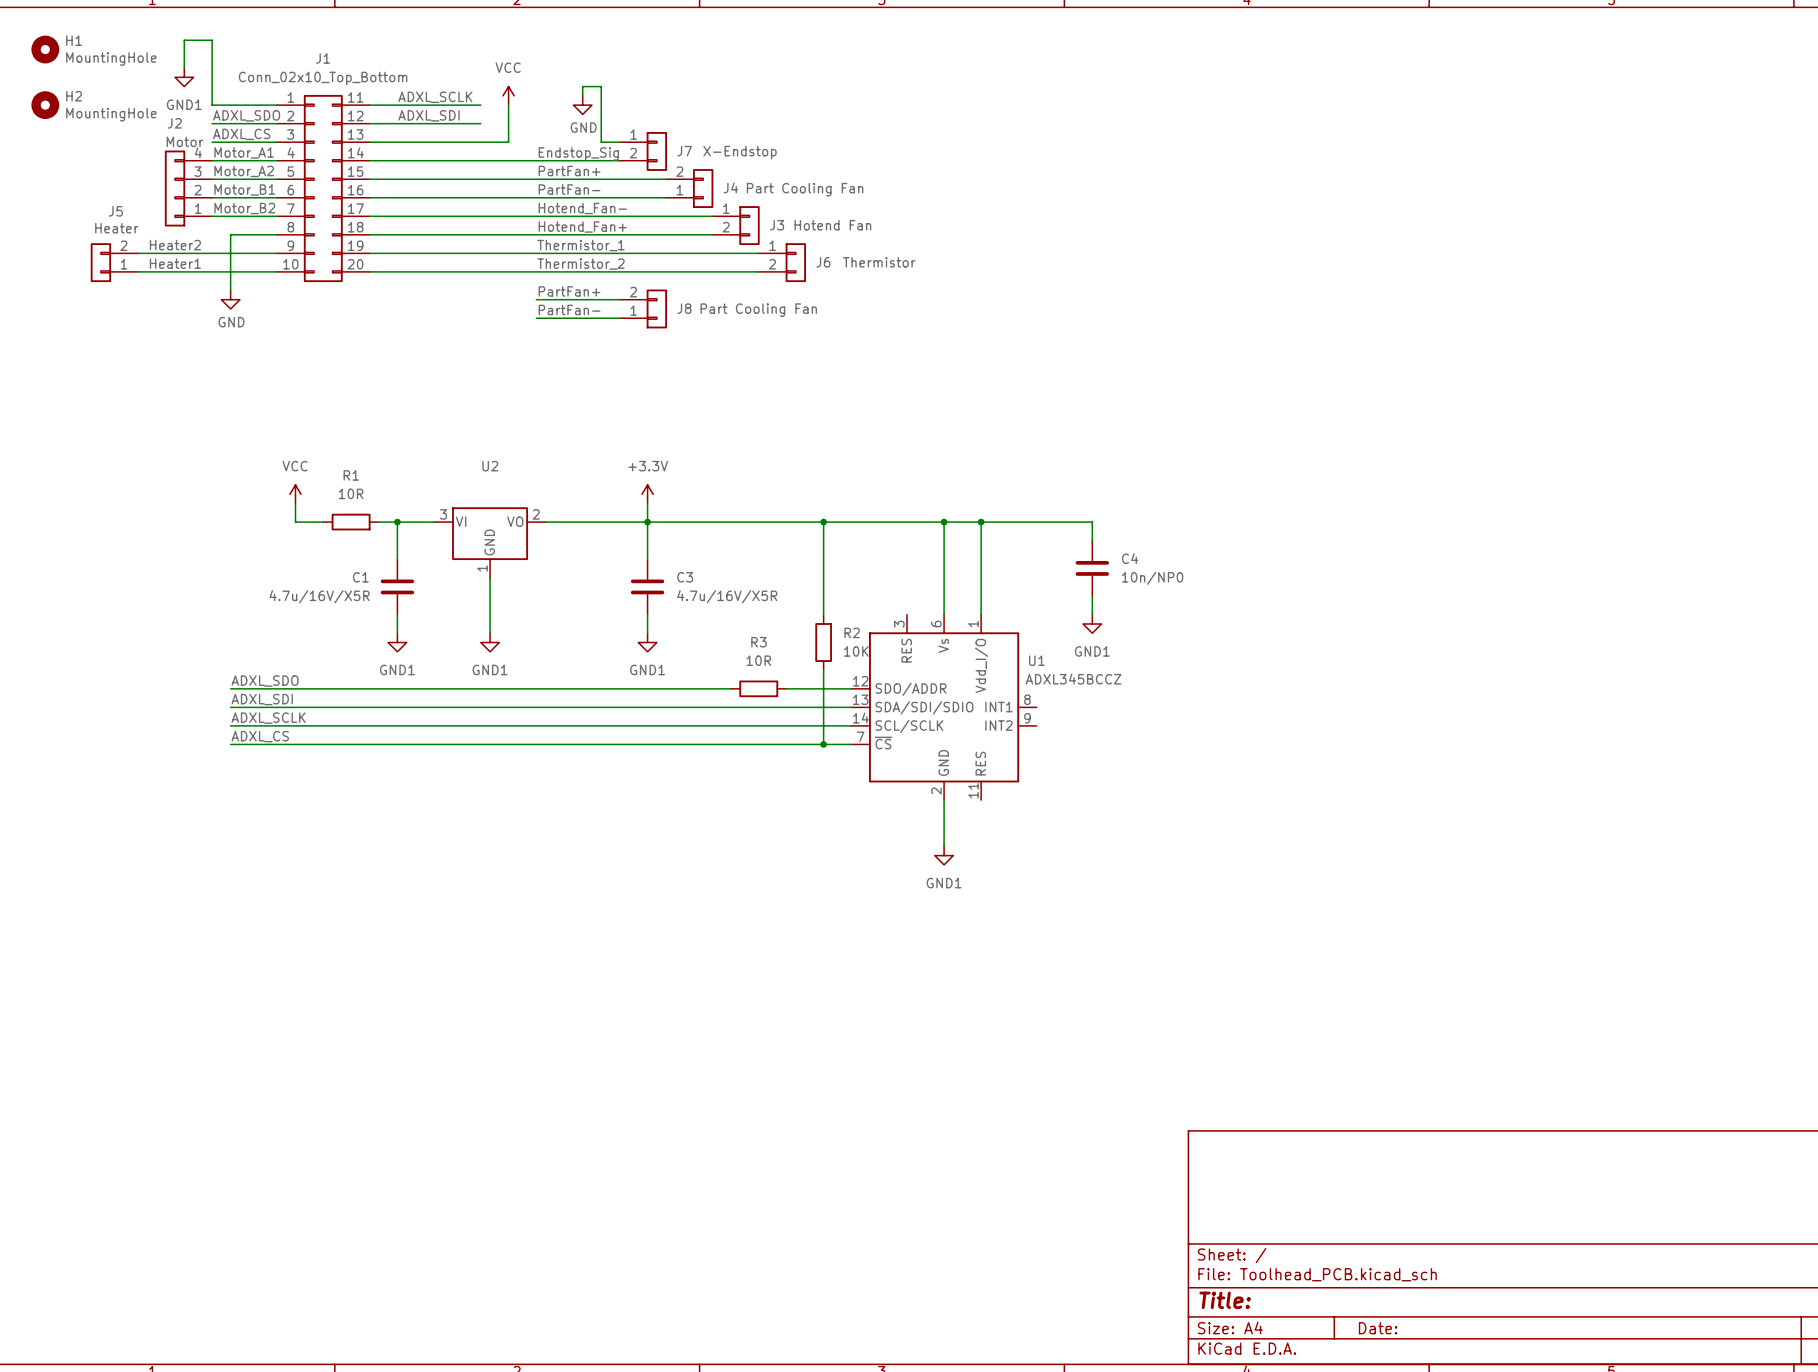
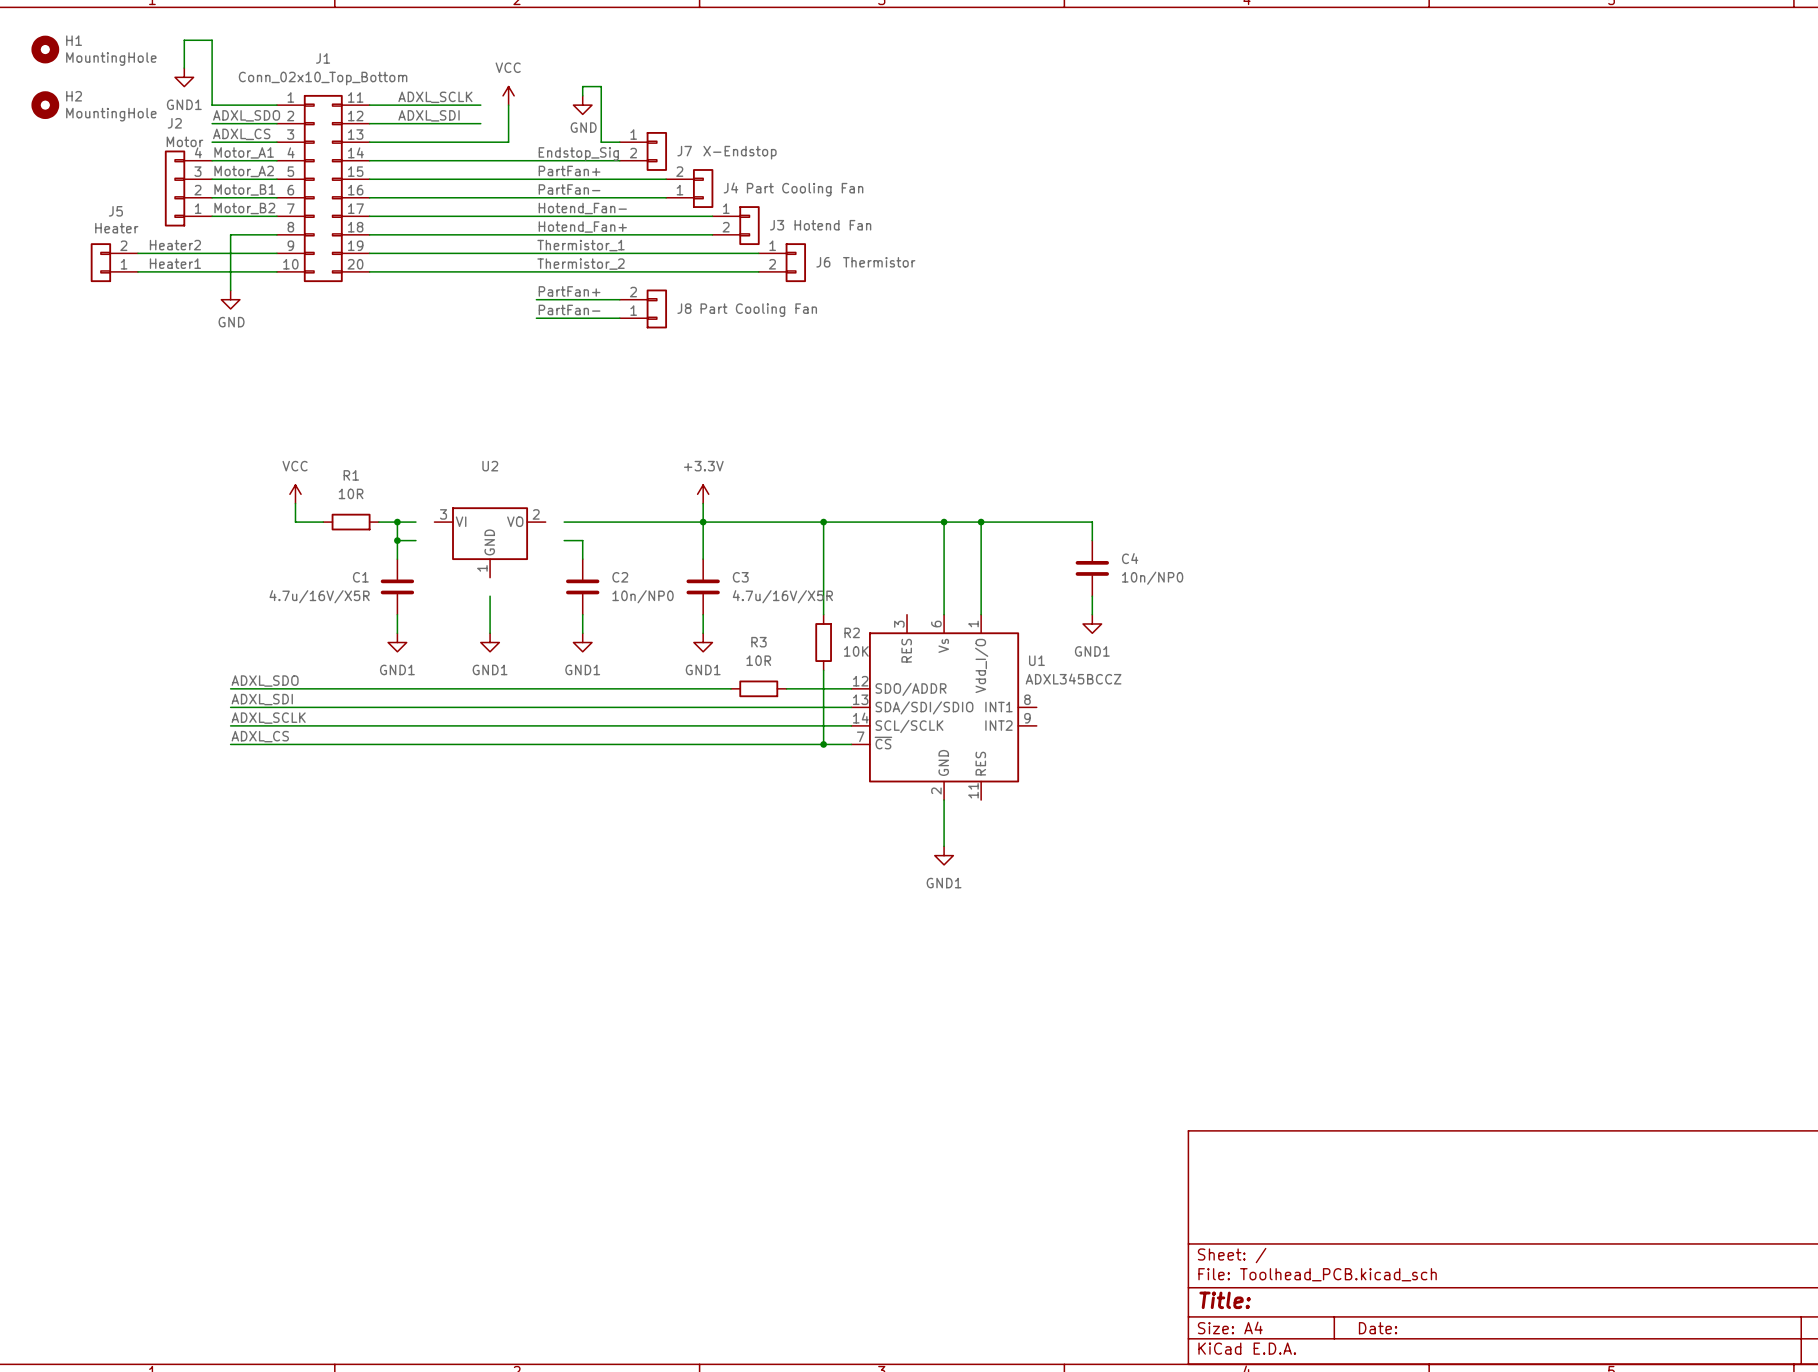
power symbol position: +3.3V (647, 494) -> +3.3V (703, 494)
wire: (647, 503) (647, 559) -> (703, 503) (703, 559)
wire: (415, 522) (434, 522) -> (397, 540) (415, 540)
wire: (545, 522) (564, 522) -> none
junction: (647, 522) -> none
junction: none -> (703, 522)
junction: none -> (397, 540)
wire: none -> (564, 540) (582, 540) (582, 559)
wire: (490, 577) (490, 596) -> (582, 614) (582, 633)
C2: none -> 10n/NP0 (582, 586)
C3 position: (647, 586) -> (703, 586)
wire: (647, 614) (647, 633) -> (703, 614) (703, 633)
power symbol: none -> GND1 (582, 642)
power symbol: GND1 (647, 642) -> none
power symbol: none -> GND1 (703, 642)

